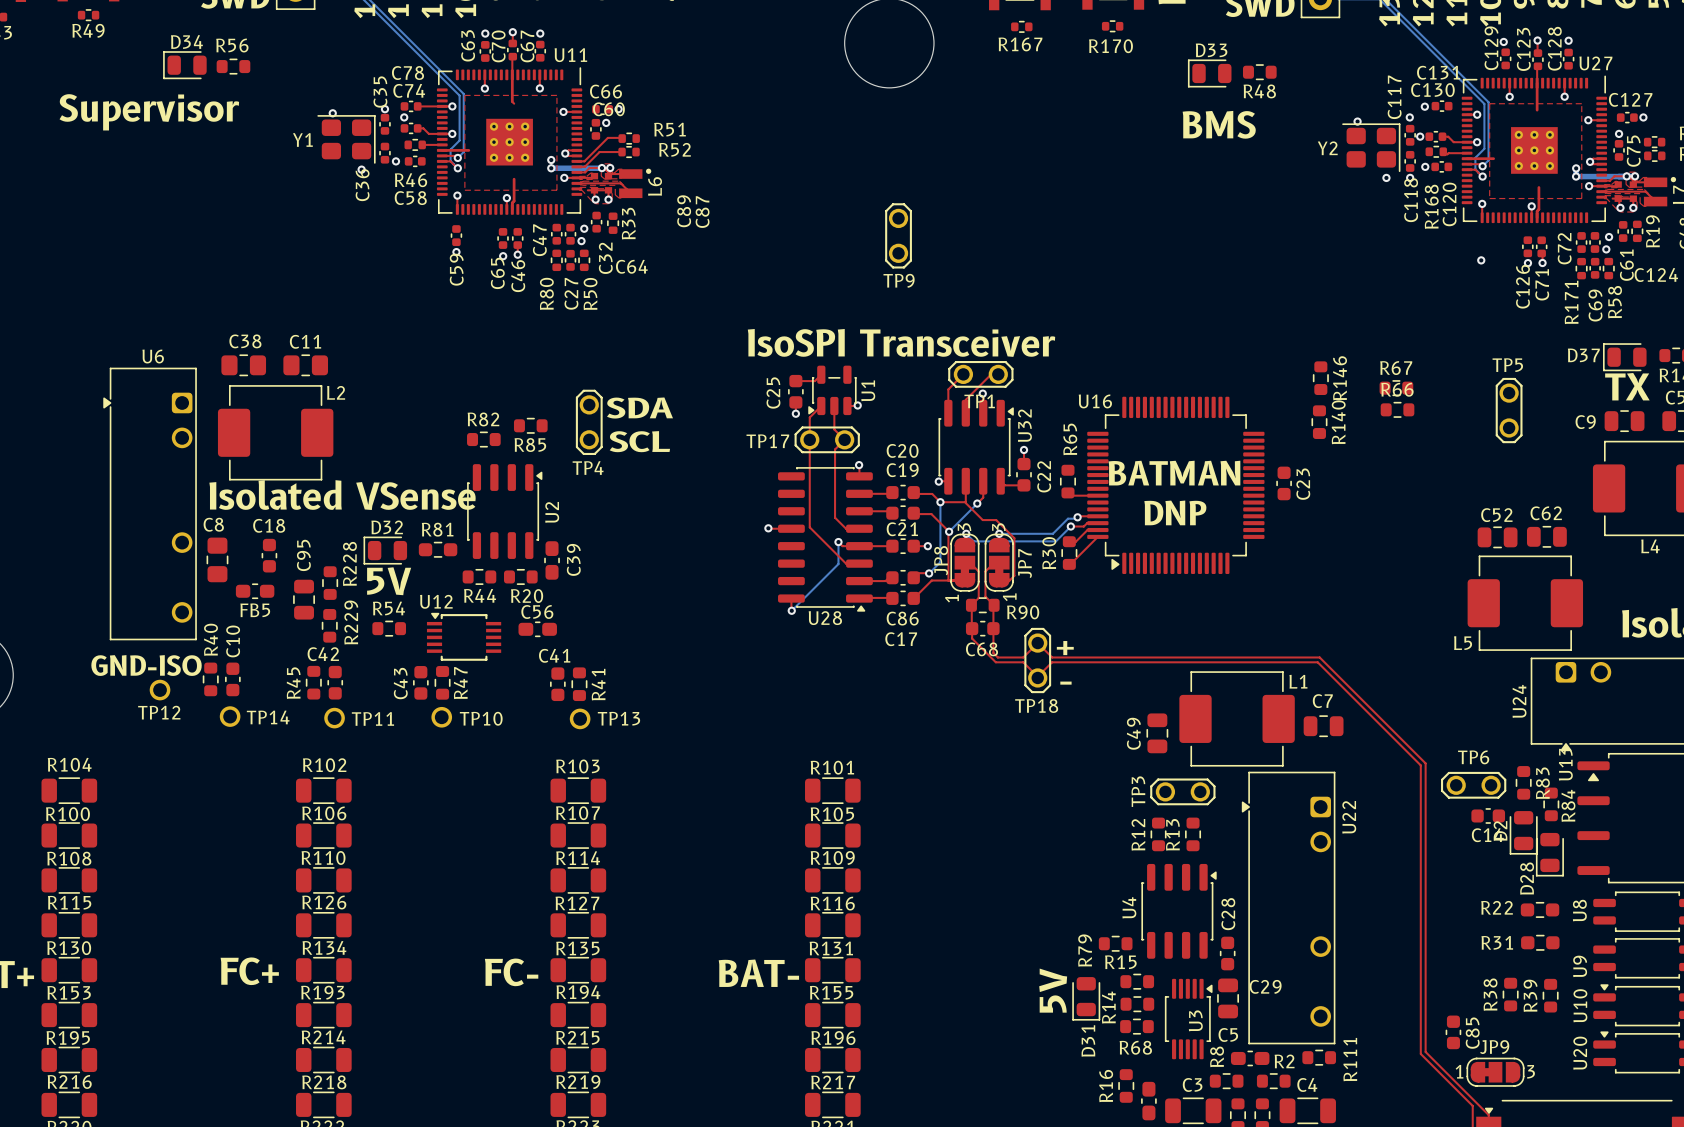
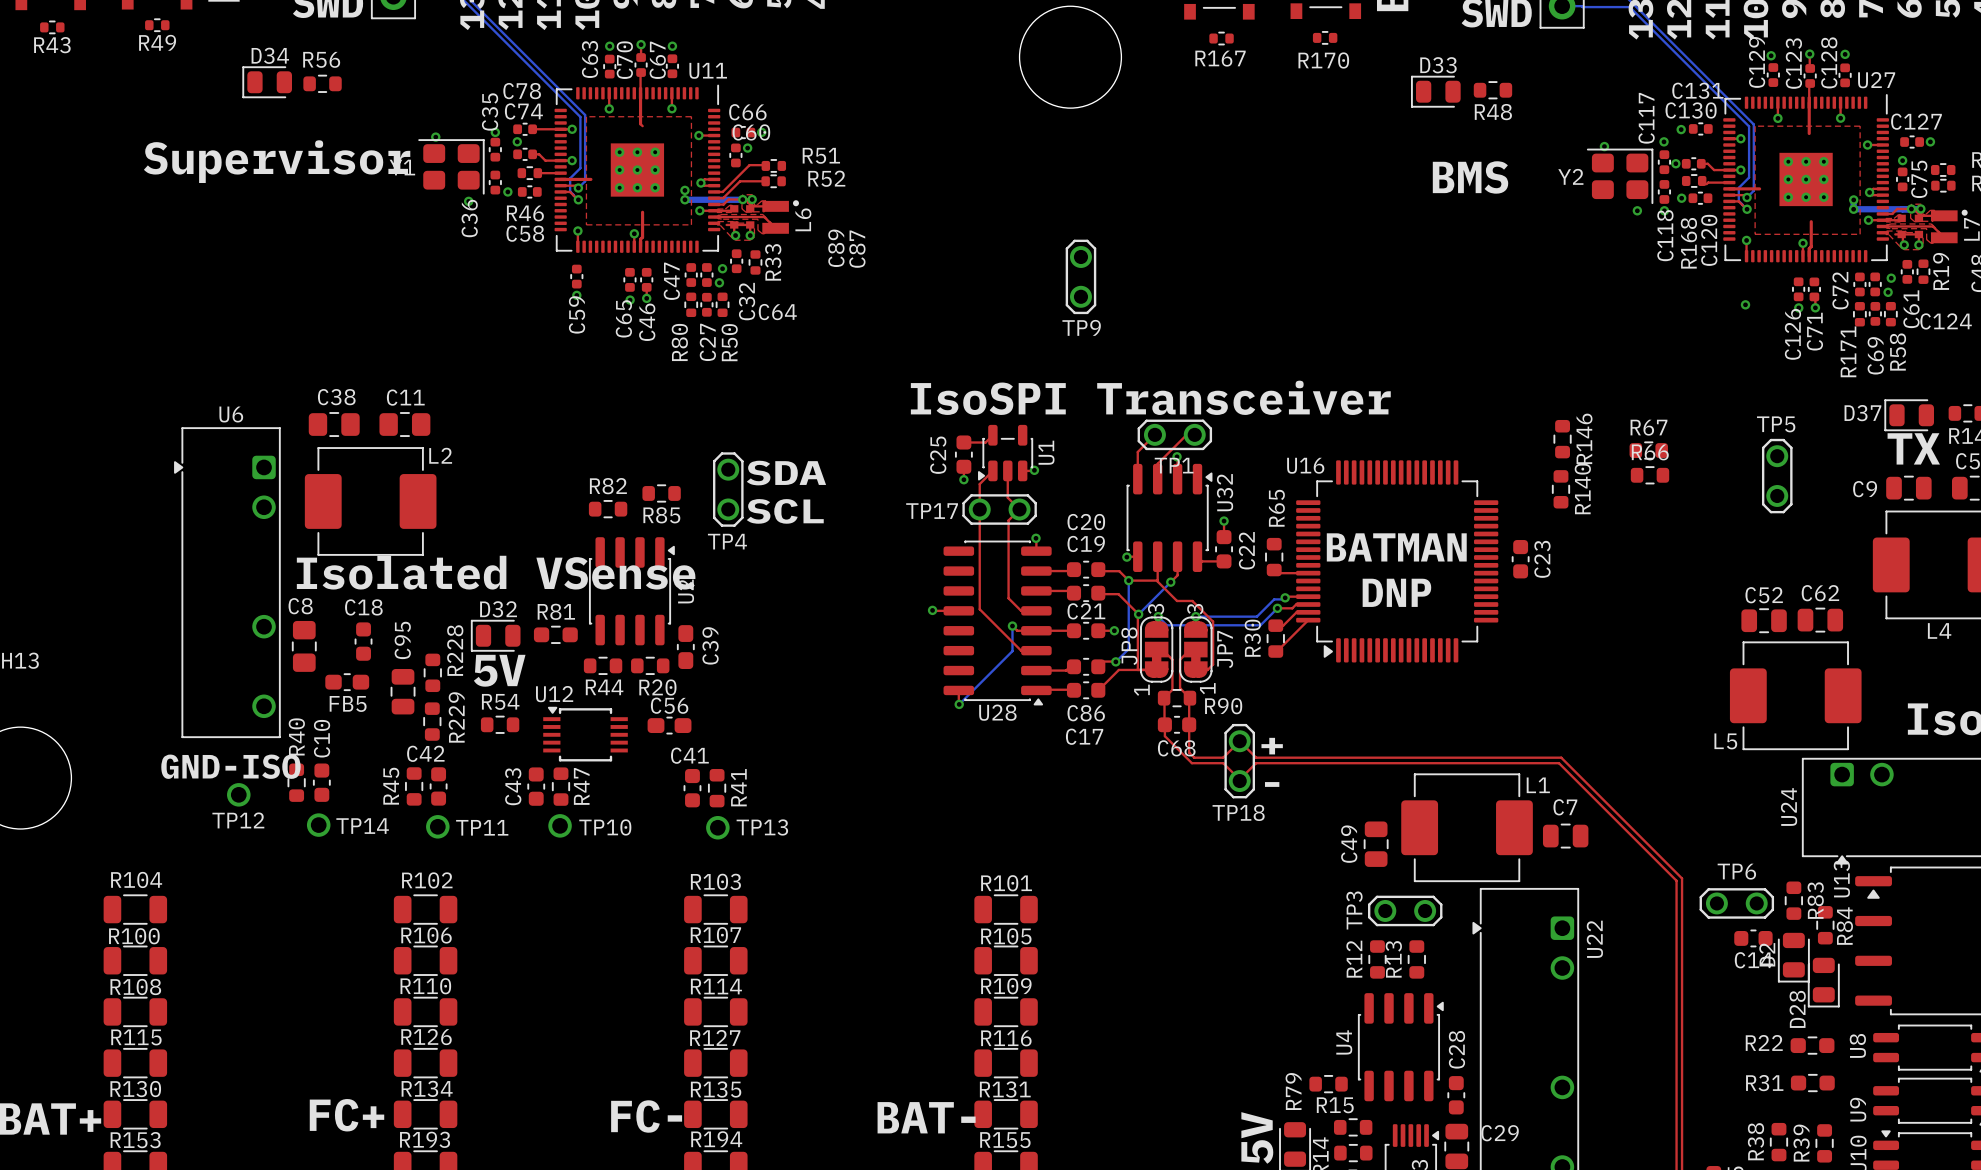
text position: Supervisor (149, 112) -> Supervisor (277, 161)
text position: BMS (1219, 124) -> BMS (1470, 177)

